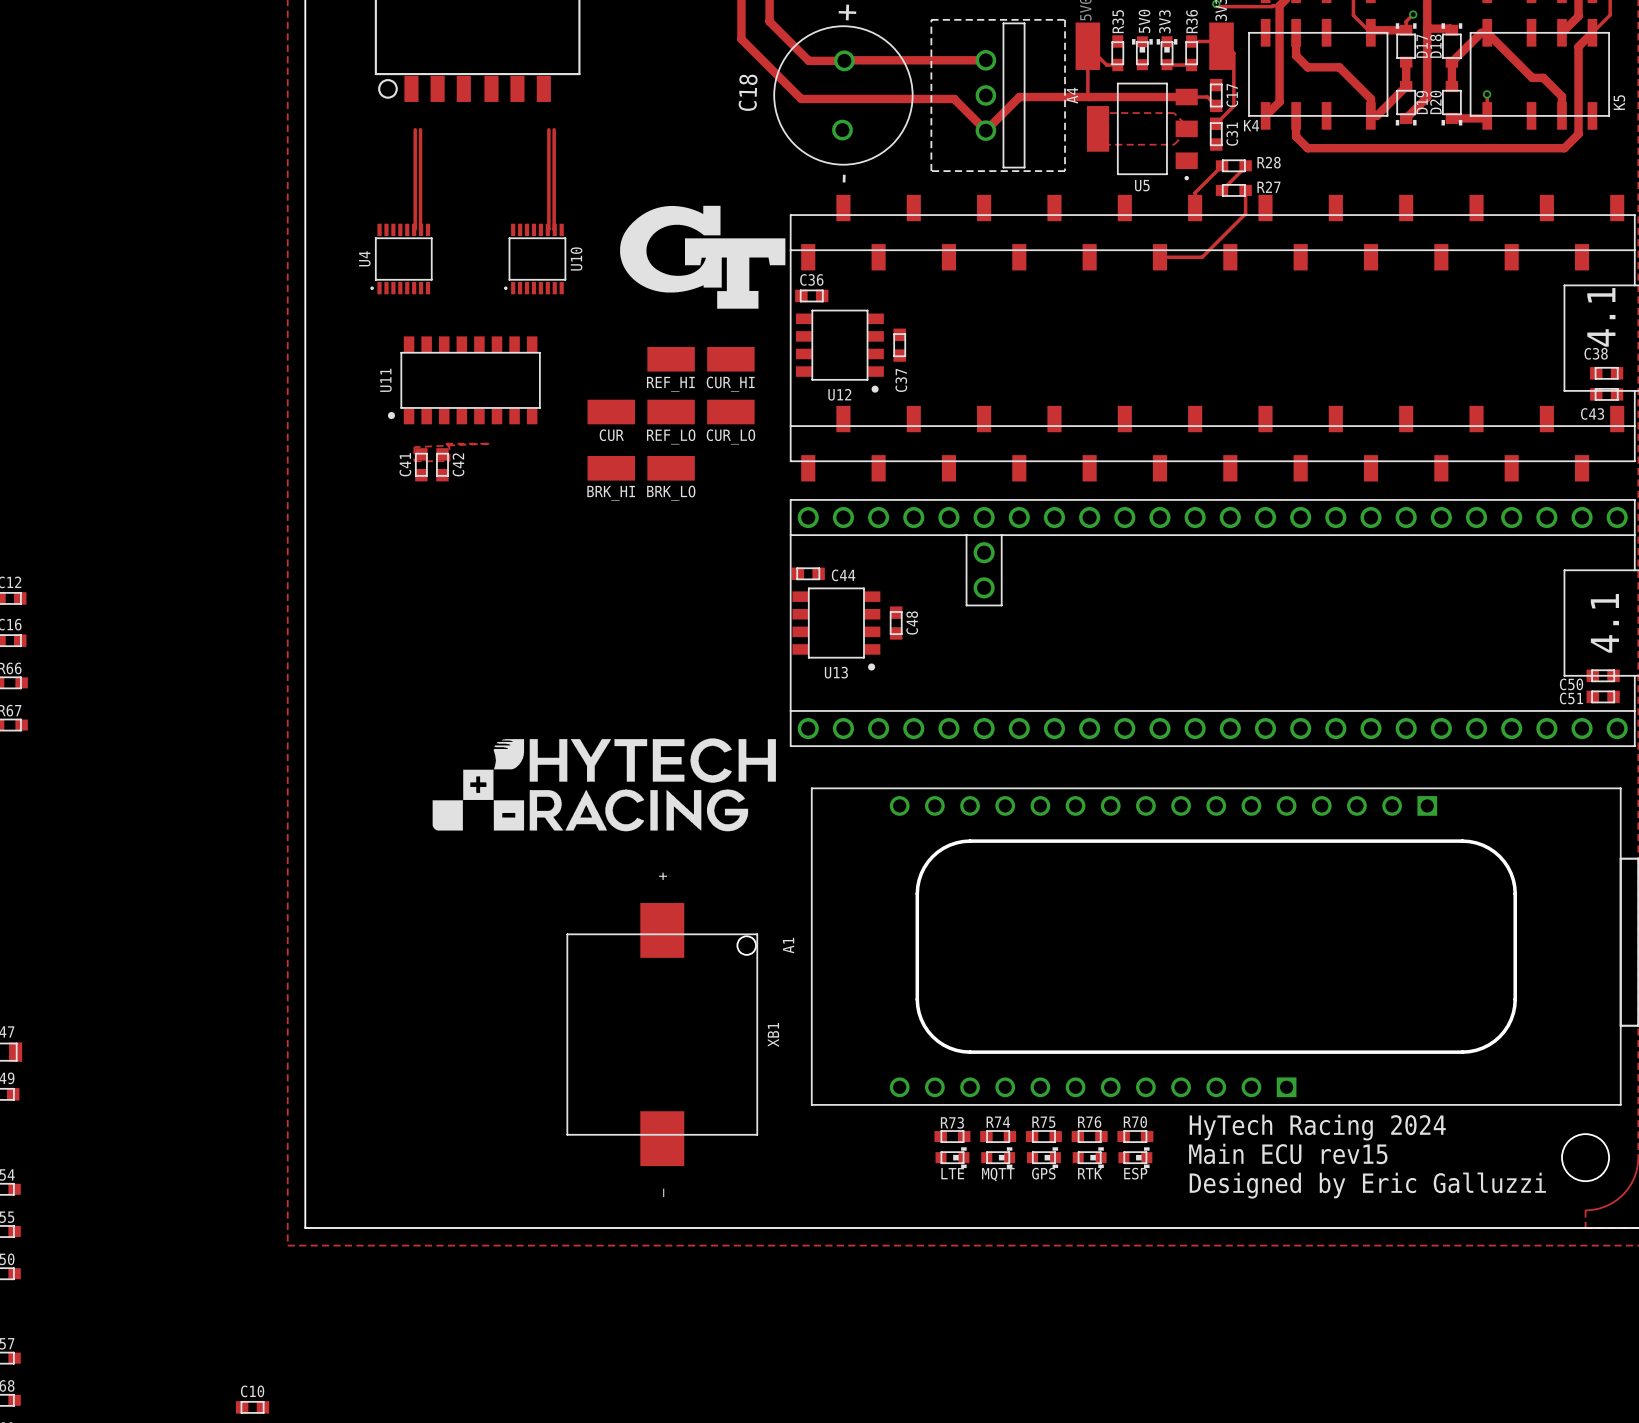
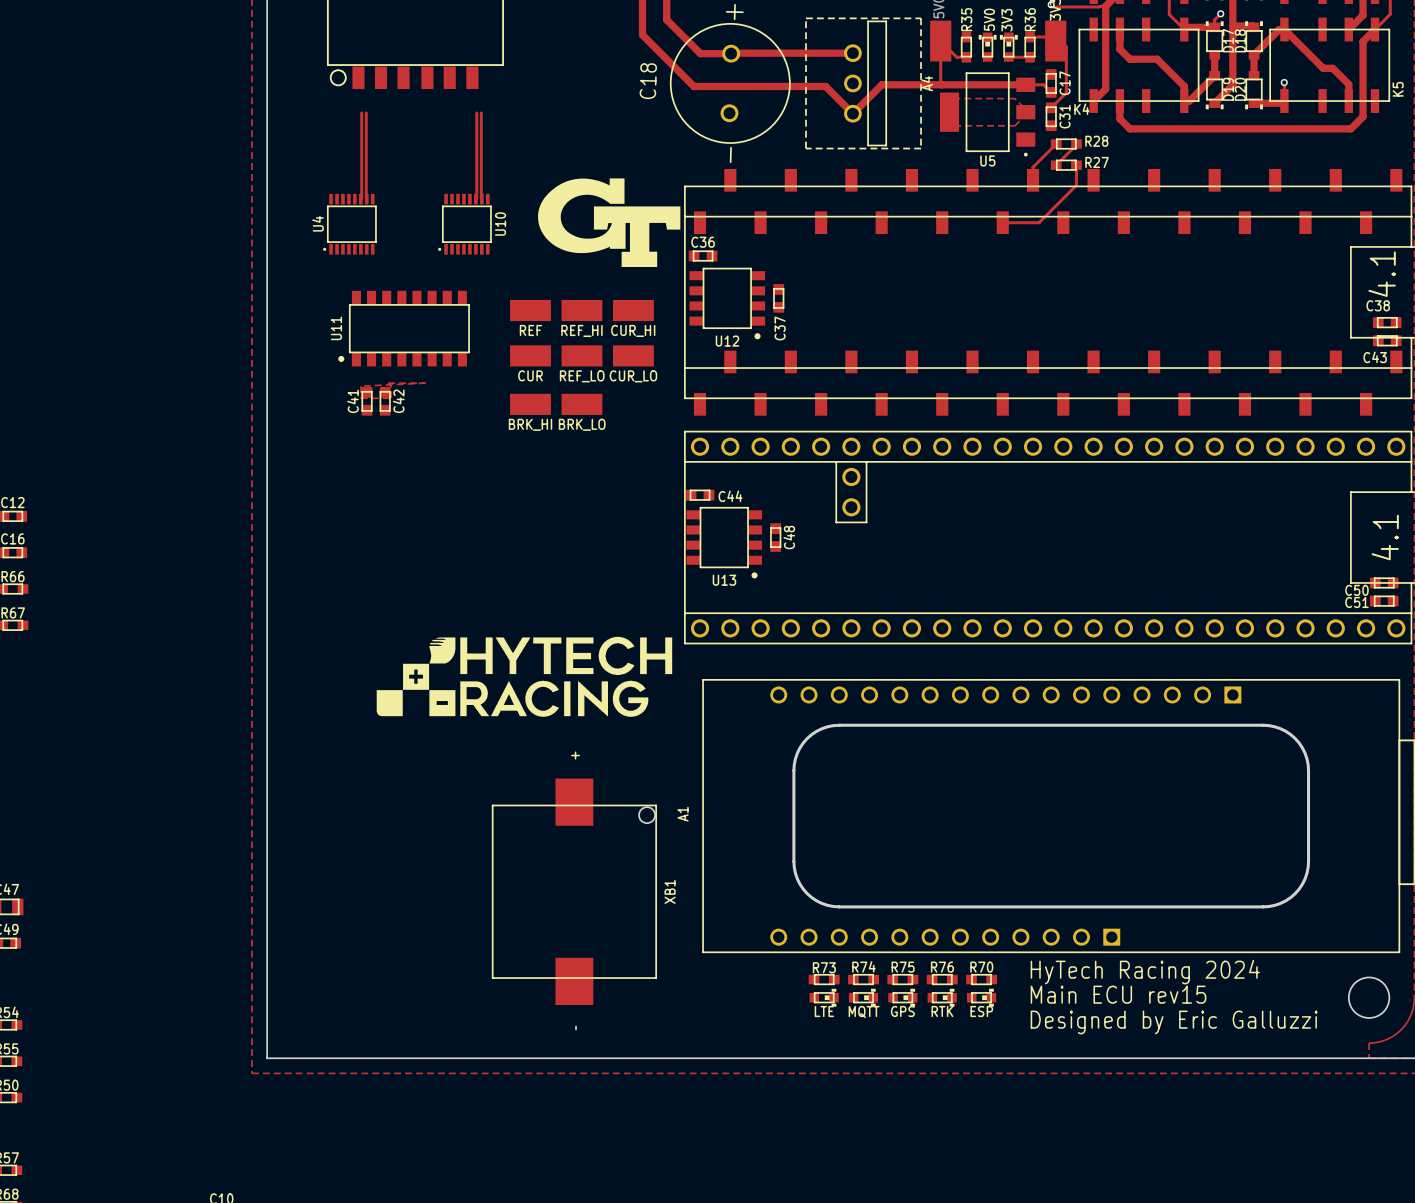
part: none -> (530, 310)

